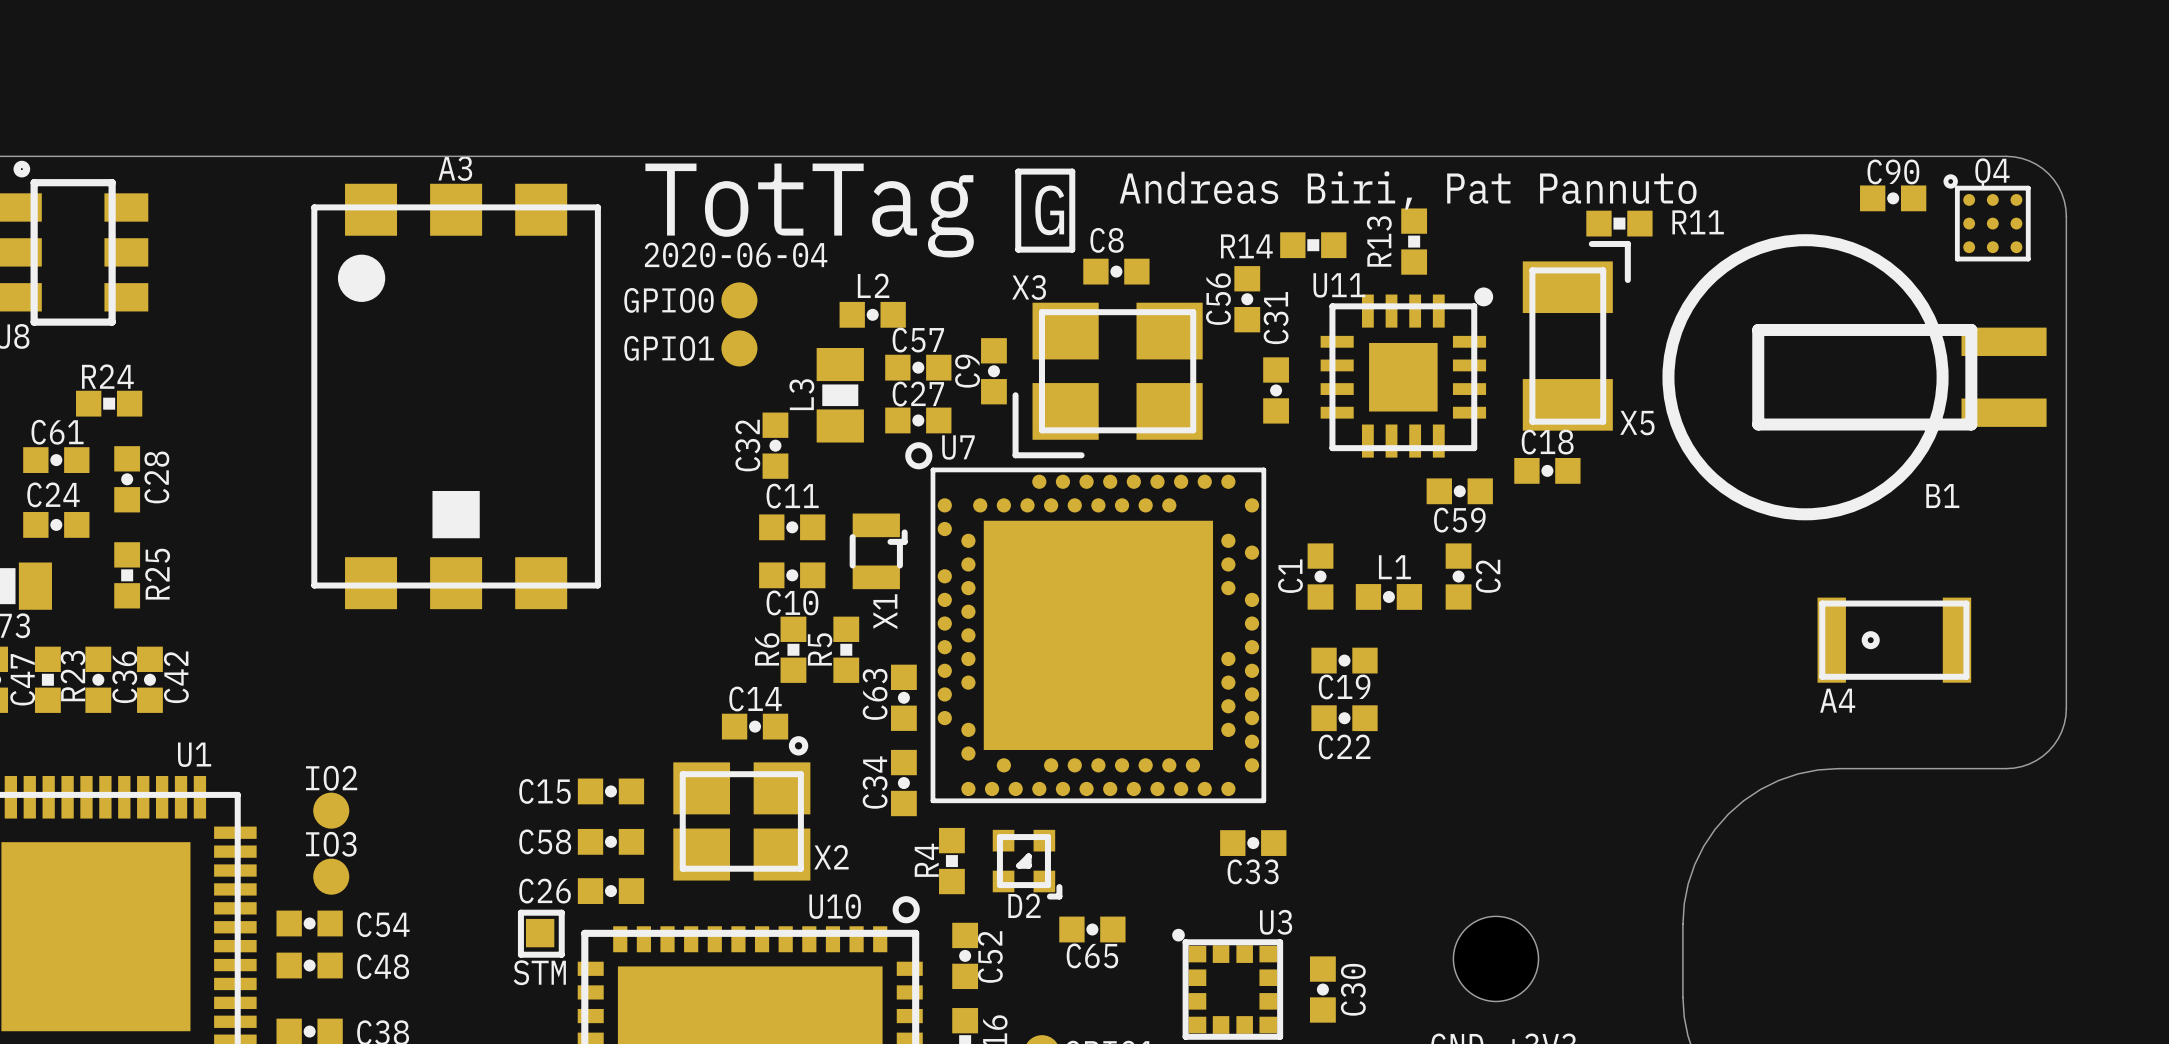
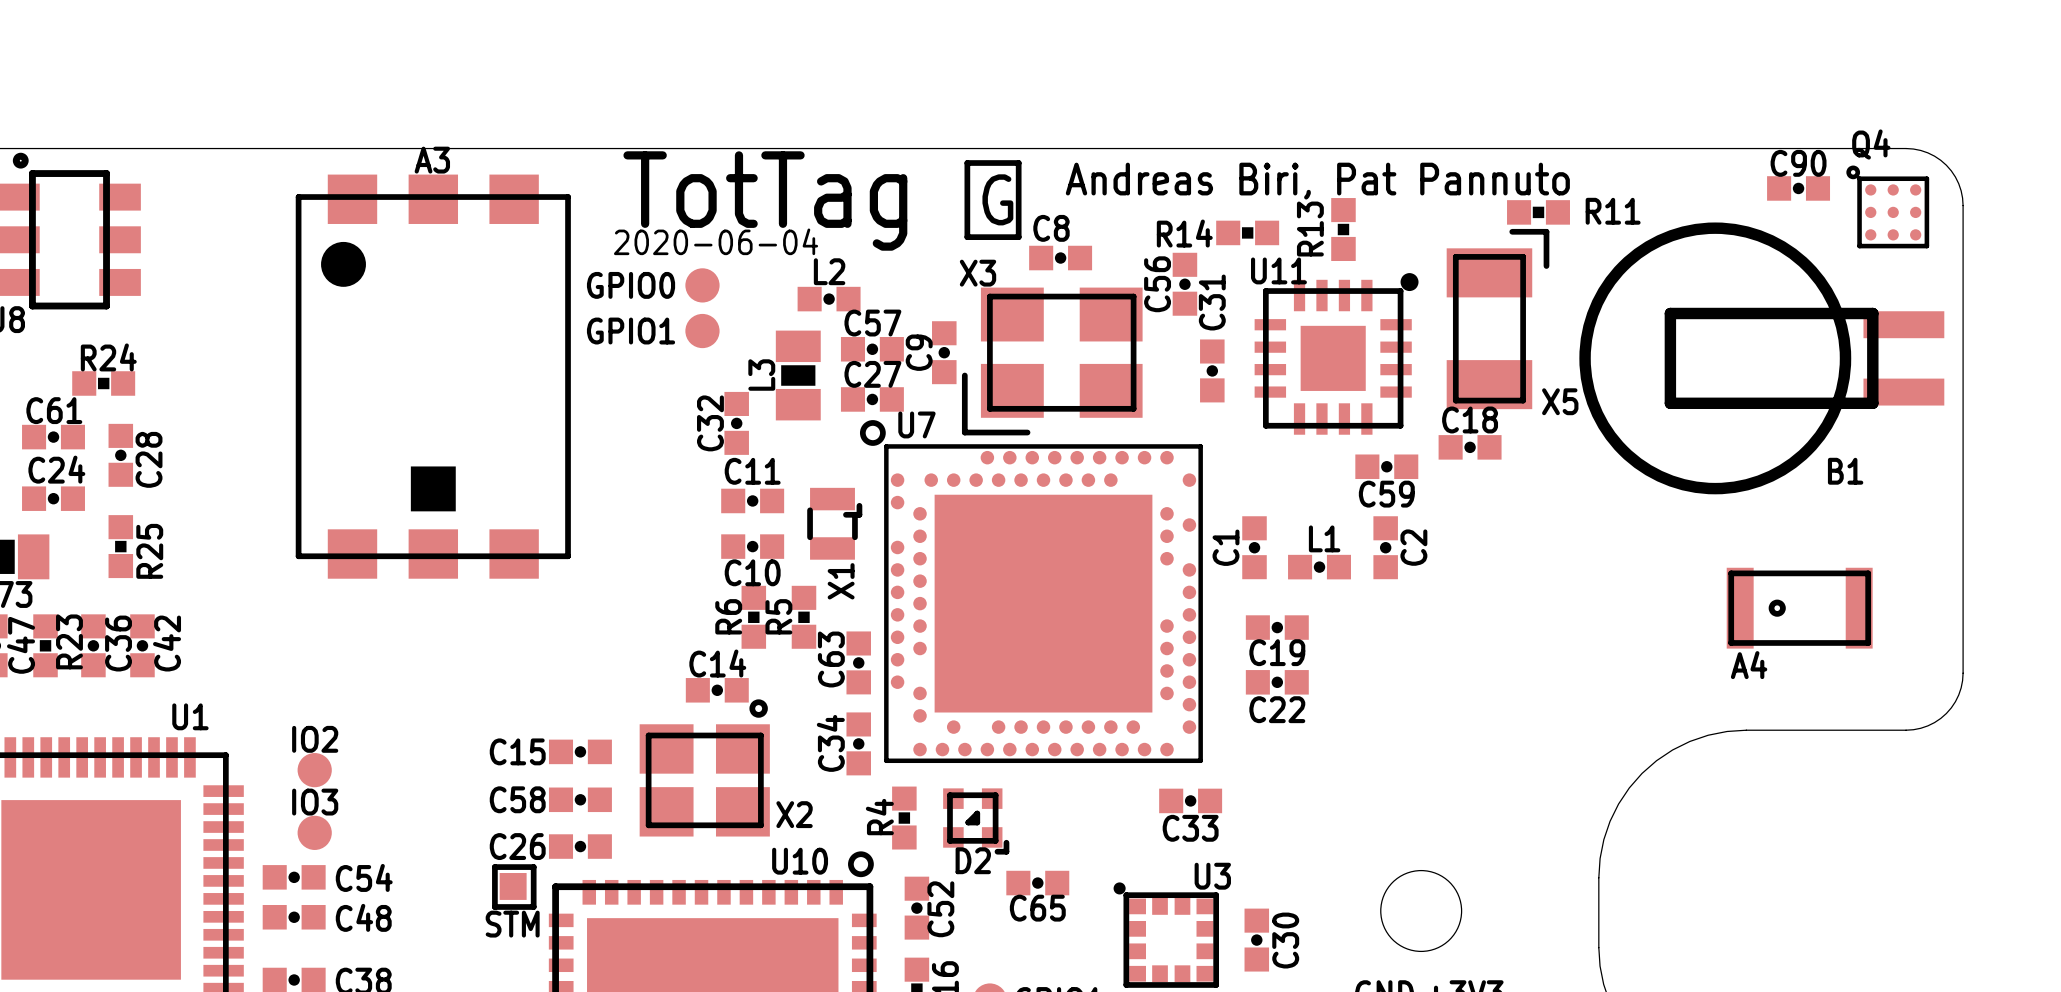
Q4 name position: Q4 (1992, 173) -> Q4 (1871, 144)

